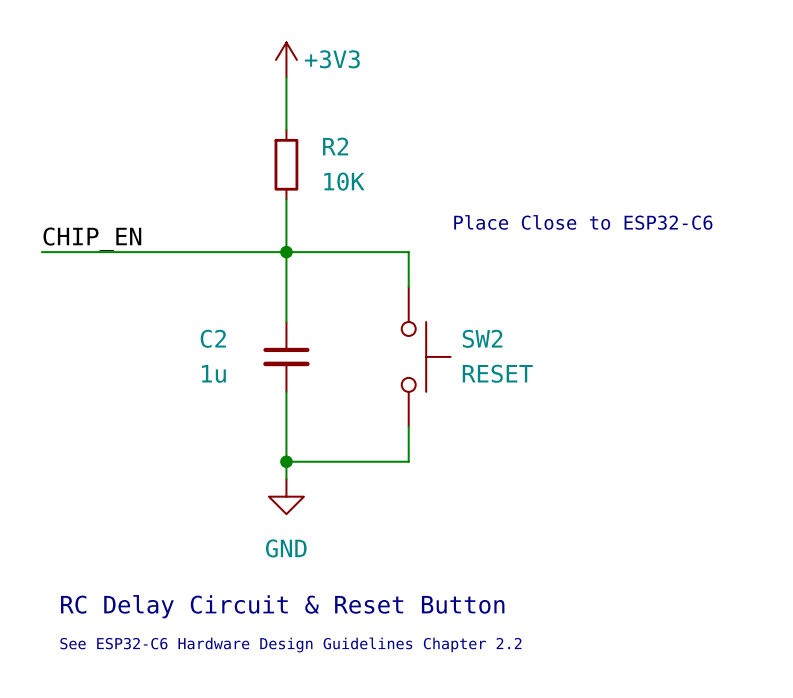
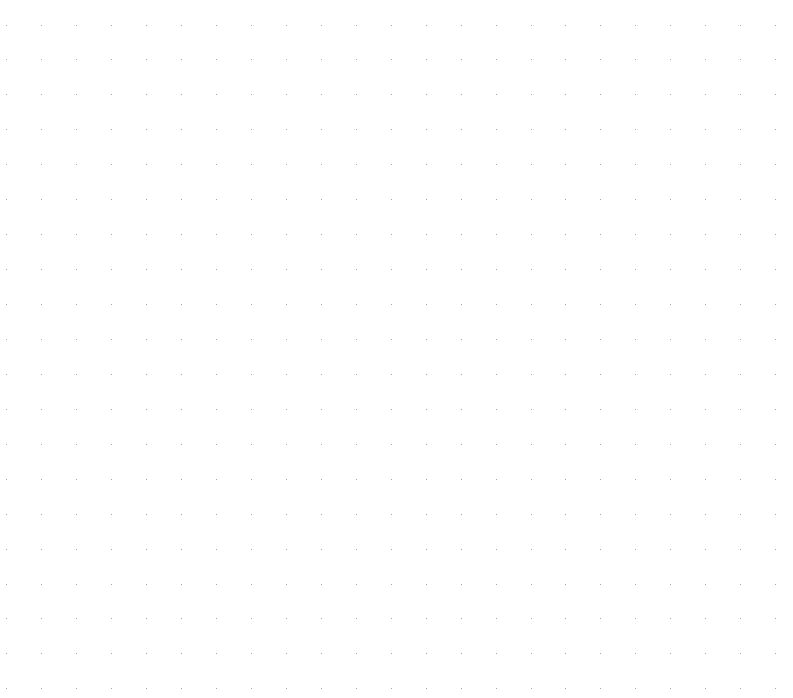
power symbol: +3V3 (286, 59) -> none
wire: (286, 77) (286, 129) -> none
R2: 10K (286, 164) -> none
wire: (286, 199) (286, 321) -> none
text: Place Close to ESP32-C6 (583, 222) -> none
label: CHIP_EN (92, 239) -> none
wire: (41, 252) (408, 252) (408, 287) -> none
junction: (286, 252) -> none
C2: 1u (286, 356) -> none
SW2: RESET (426, 356) -> none
wire: (286, 391) (286, 479) -> none
wire: (408, 426) (408, 461) (286, 461) -> none
junction: (286, 461) -> none
power symbol: GND (286, 496) -> none
text: RC Delay Circuit & Reset Button (282, 606) -> none
text: See ESP32-C6 Hardware Design Guidelines Chapter 2.2 (290, 644) -> none

